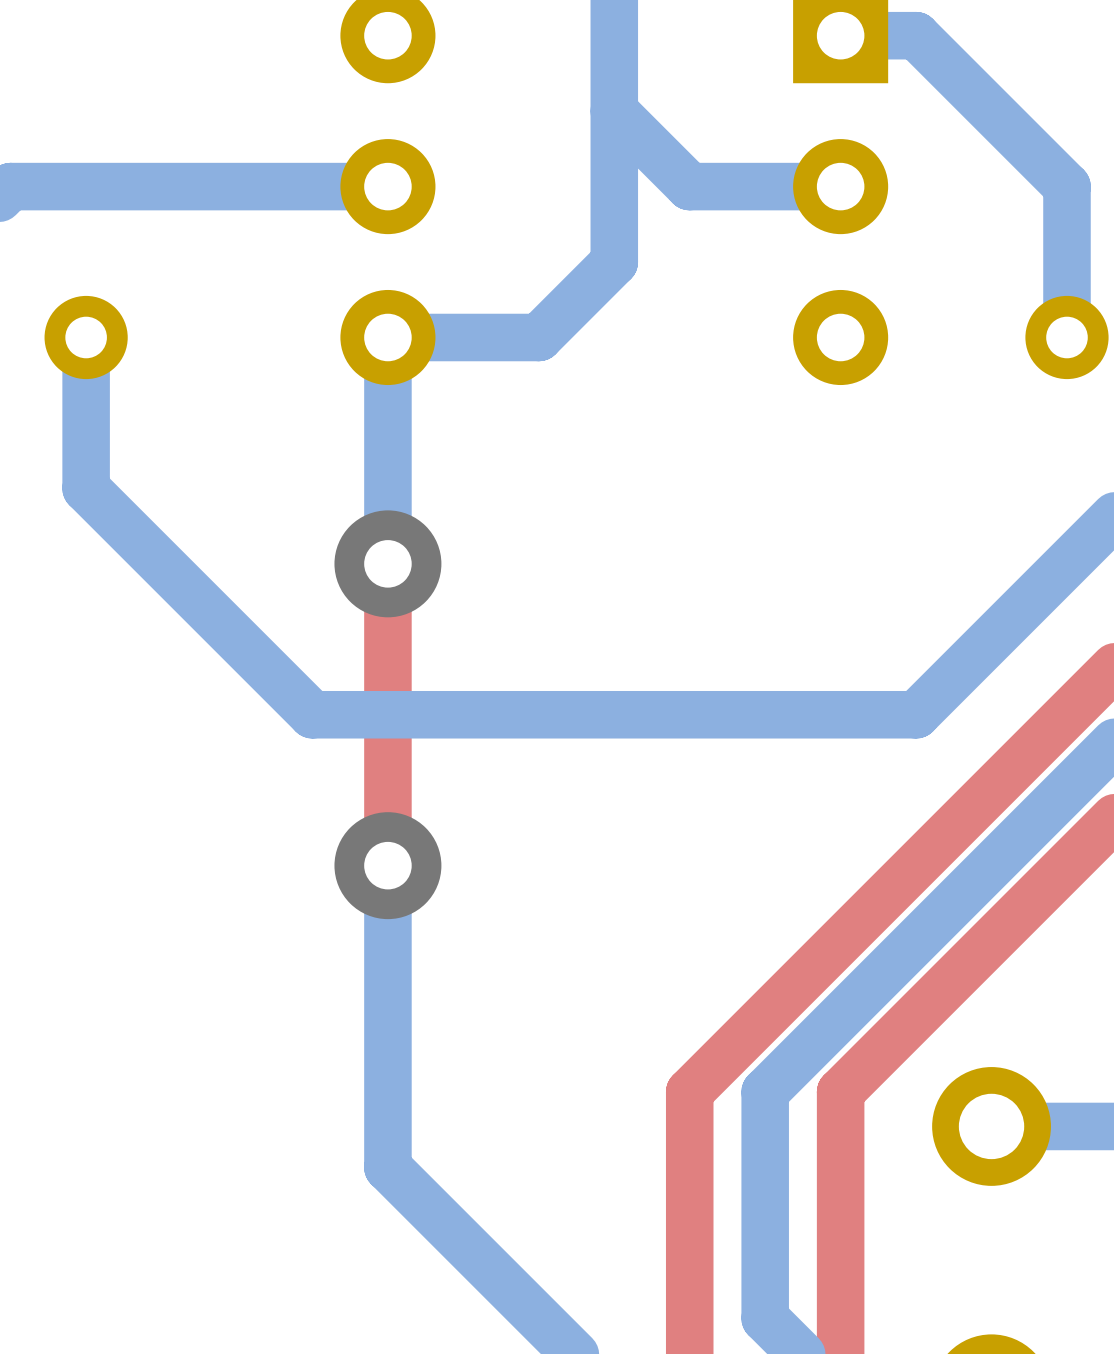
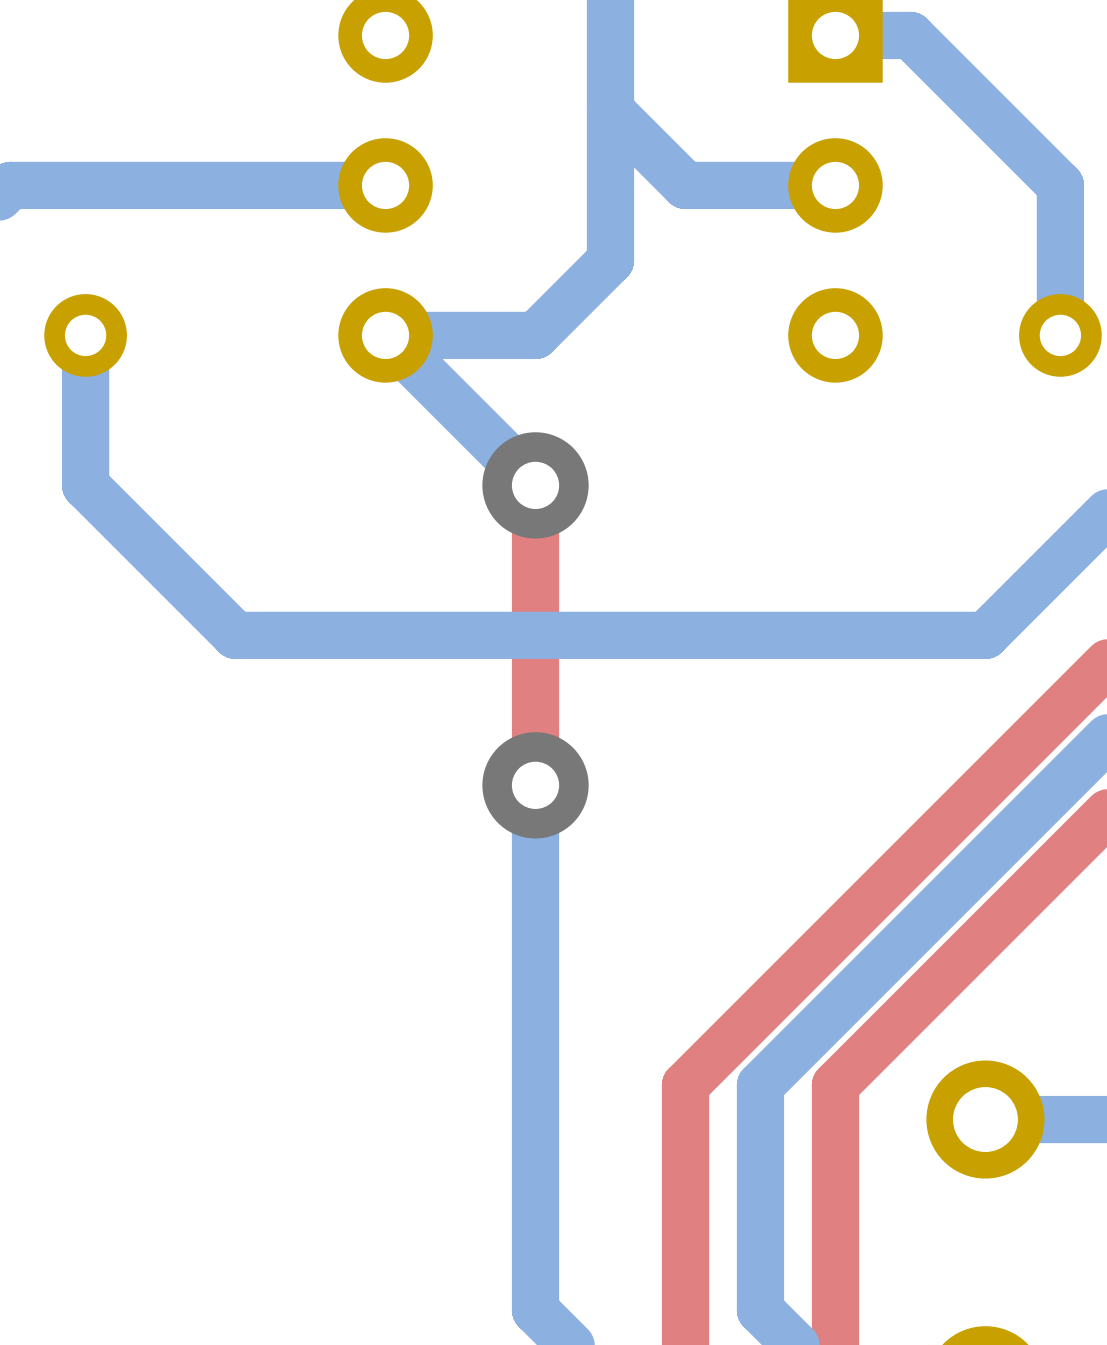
bottom track: (387, 337) (387, 563) -> (385, 335) (535, 485)
via: none -> (535, 485)
top track: (387, 563) (387, 865) -> (535, 485) (535, 785)
via: (387, 563) -> none
bottom track: (991, 639) (916, 714) (312, 714) (237, 639) -> (985, 635) (235, 635)
via: none -> (535, 785)
bottom track: (387, 865) (387, 1167) (538, 1318) -> (535, 785) (535, 1310)
via: (387, 865) -> none

